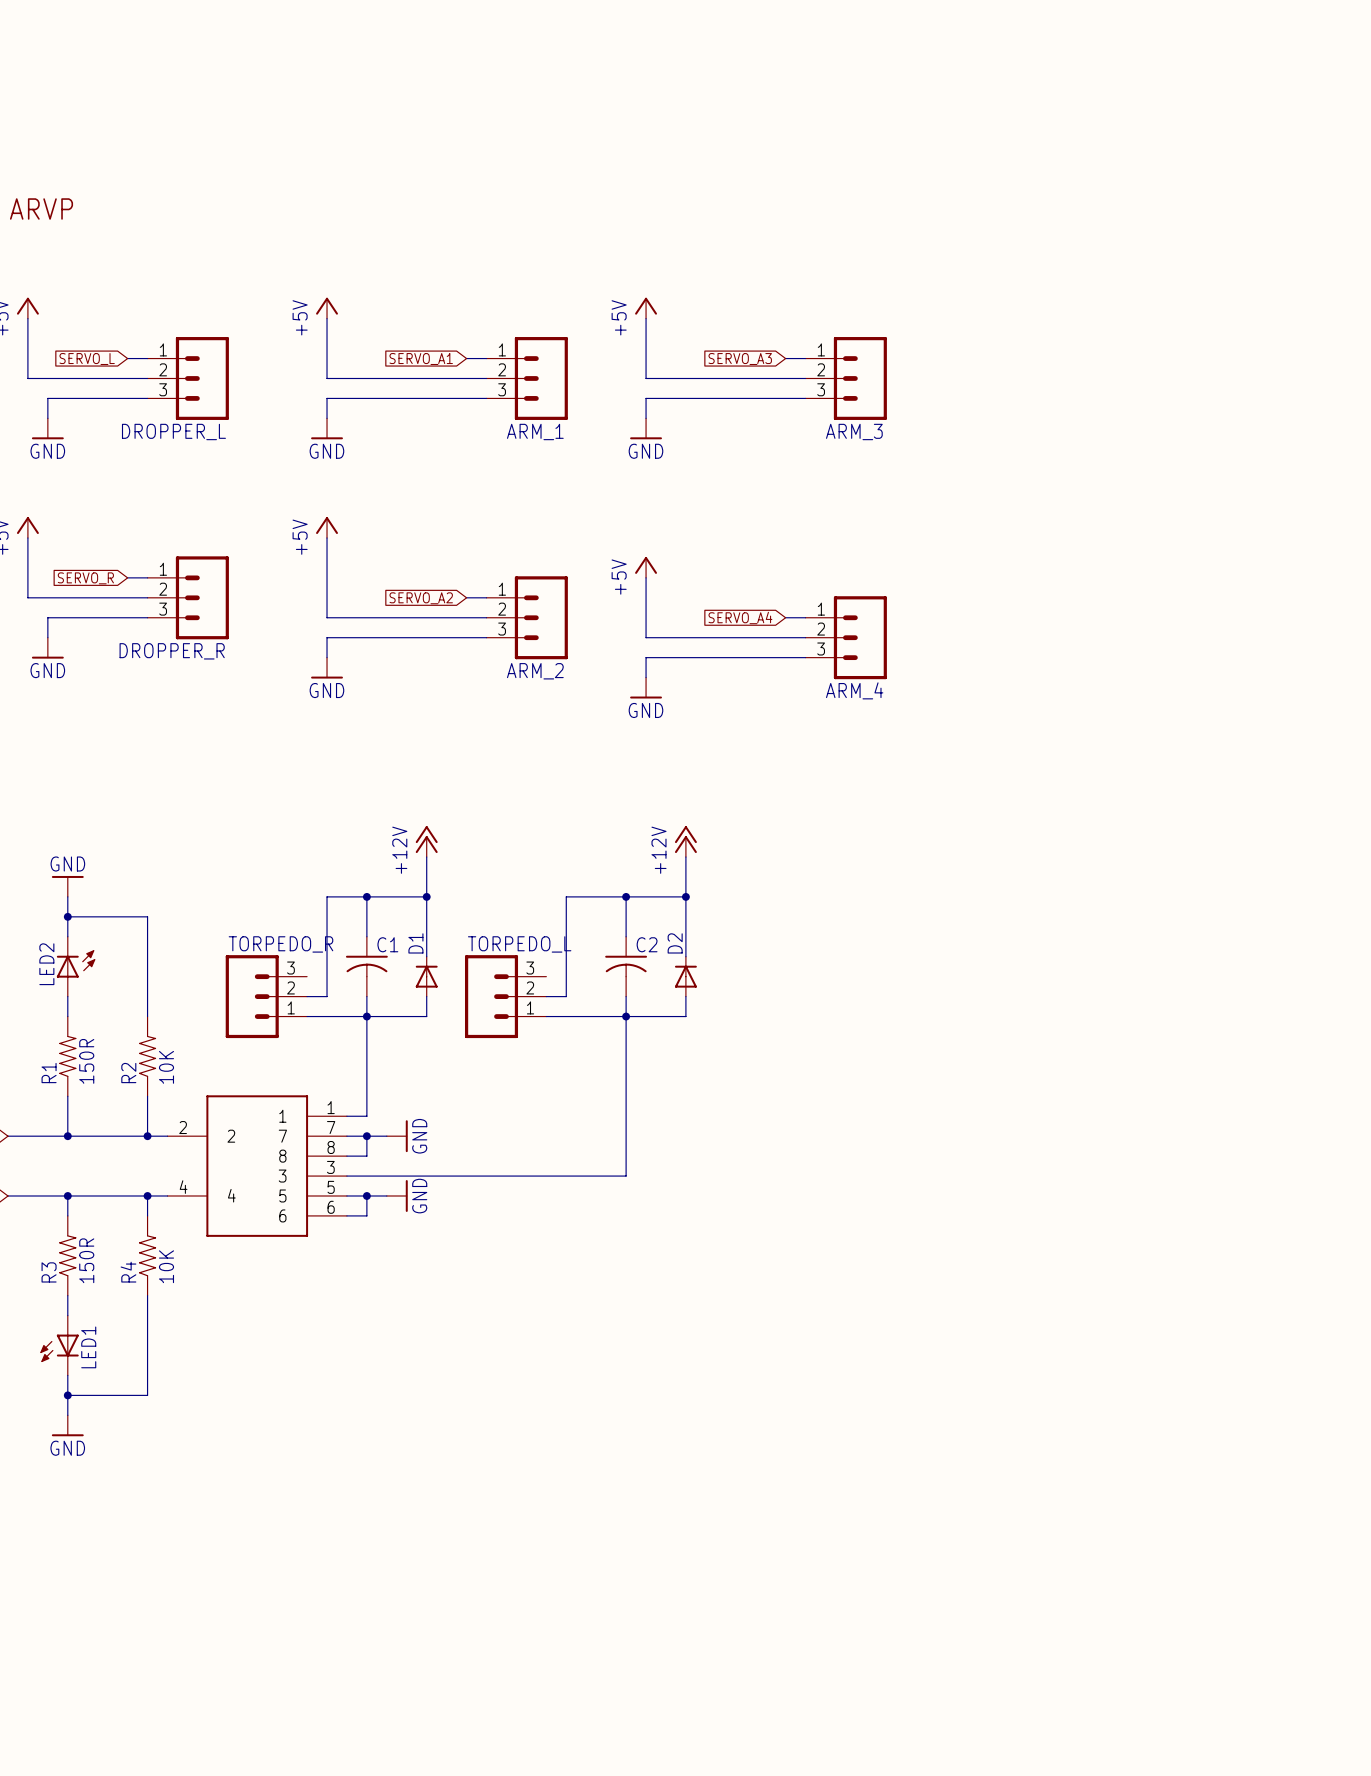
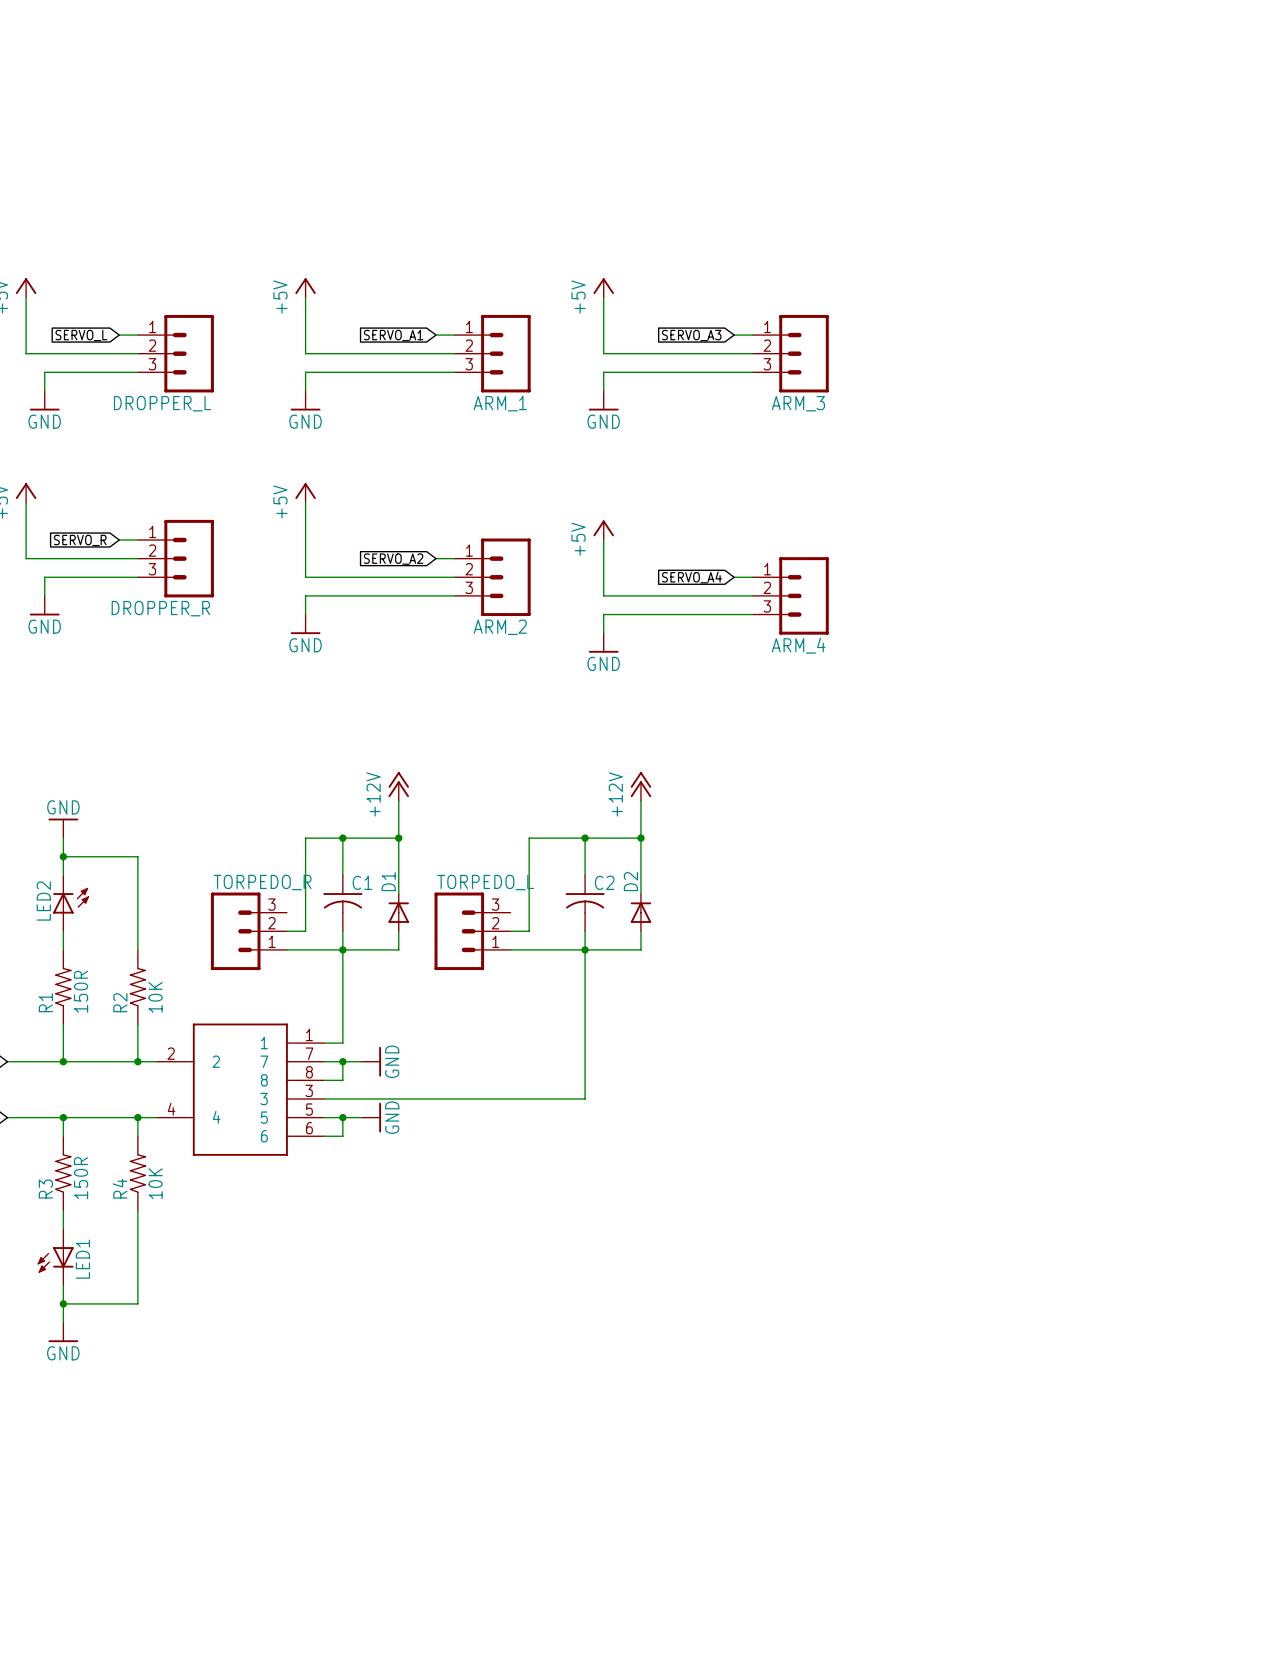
part: (41, 209) -> none

